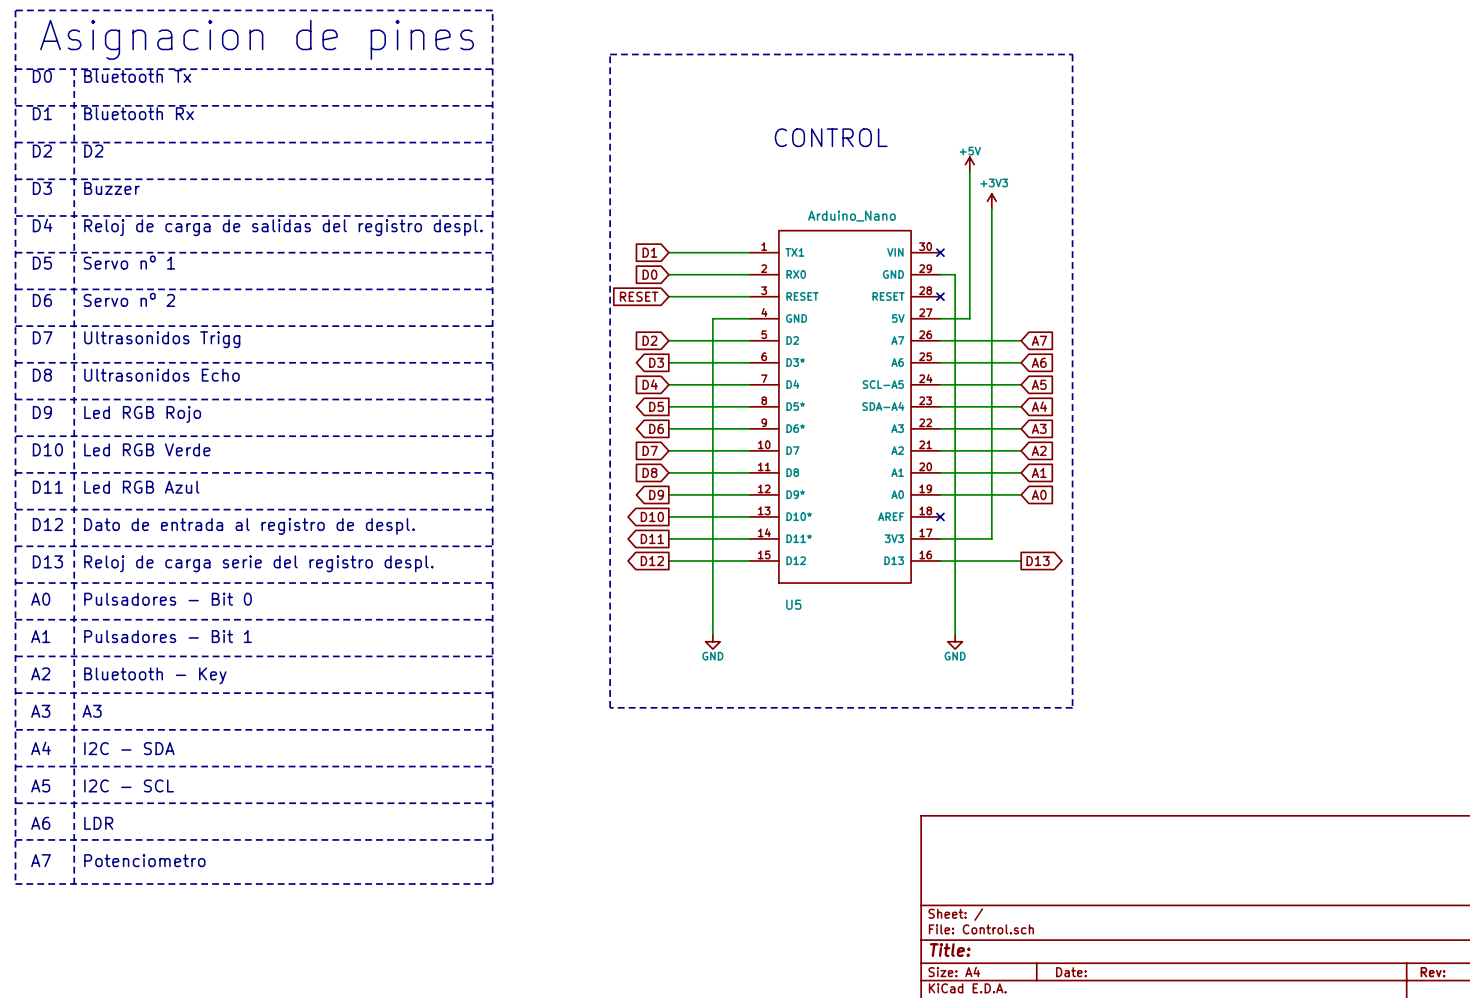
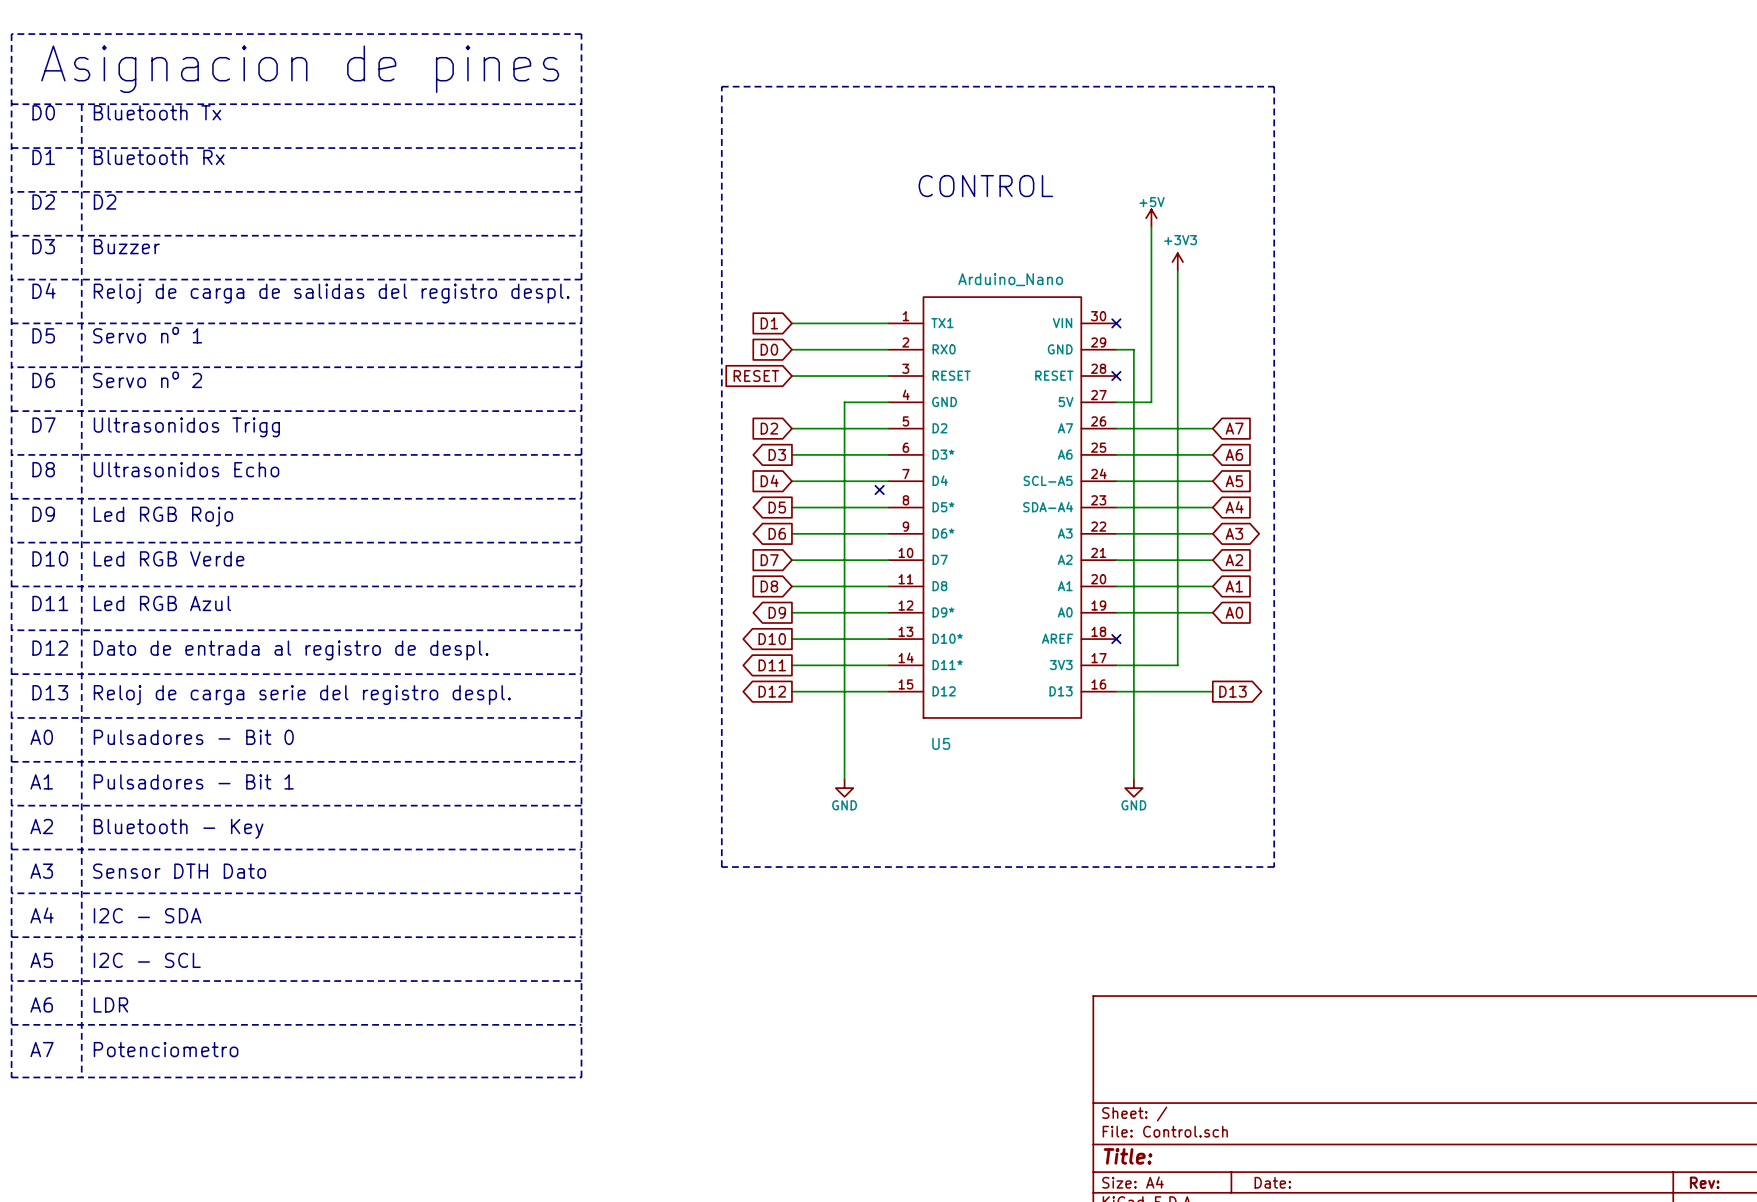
no-connect mark: none -> (879, 490)
global label shape: input (1039, 428) -> bidirectional (1234, 533)
text: A3 (92, 711) -> Sensor DTH Dato (179, 871)

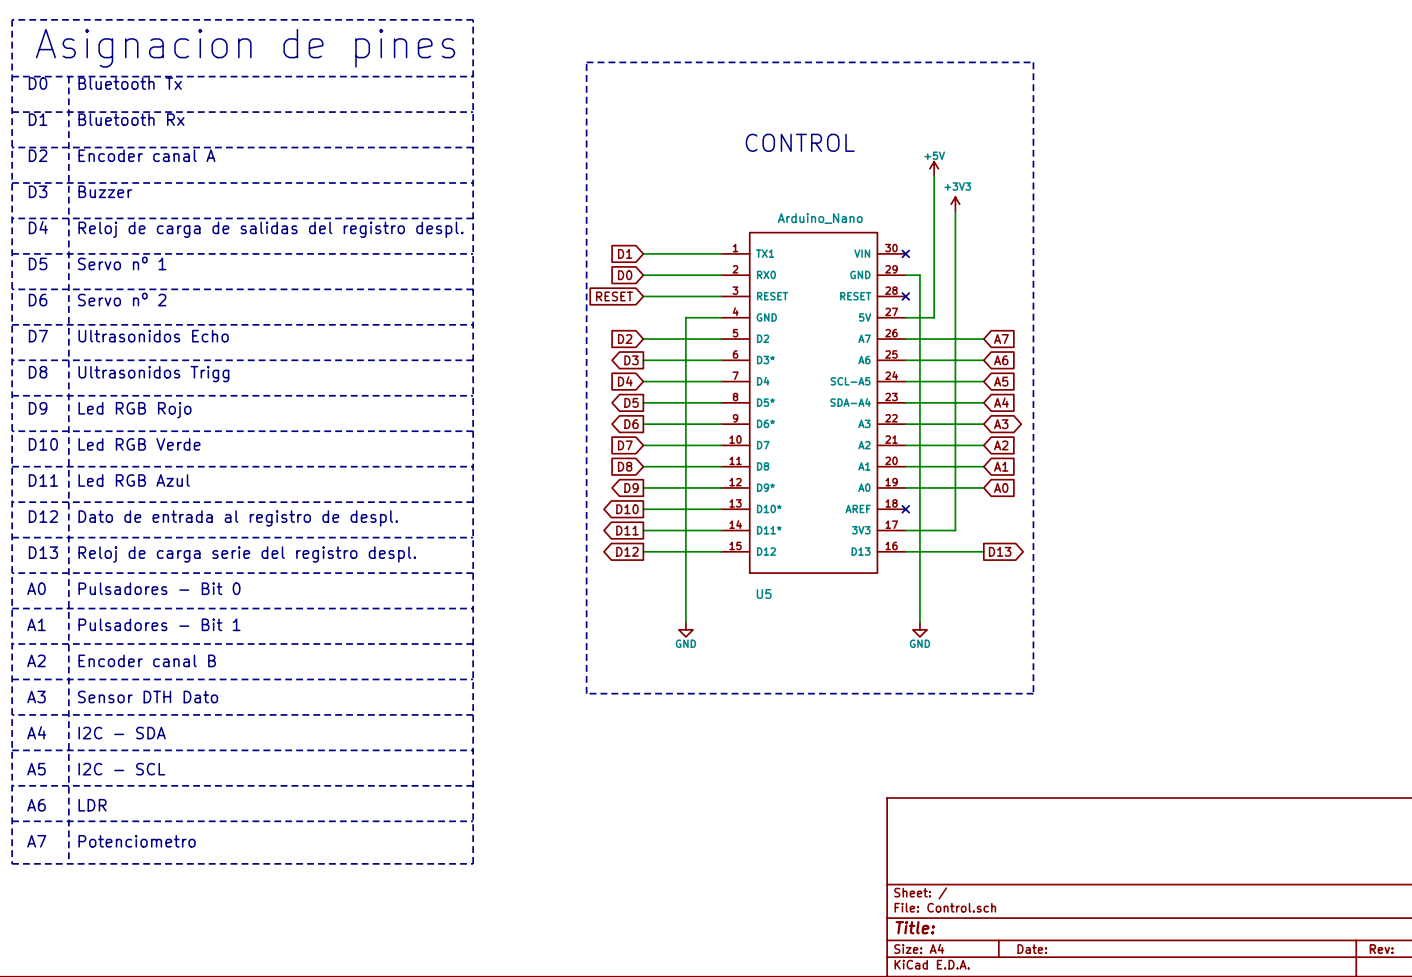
text: D2 (105, 202) -> Encoder canal A (146, 155)
text: Ultrasonidos Trigg (186, 427) -> Ultrasonidos Echo (153, 336)
text: Ultrasonidos Echo (186, 469) -> Ultrasonidos Trigg (153, 374)
no-connect mark: (879, 490) -> none
text: Bluetooth - Key (178, 828) -> Encoder canal B (147, 660)

